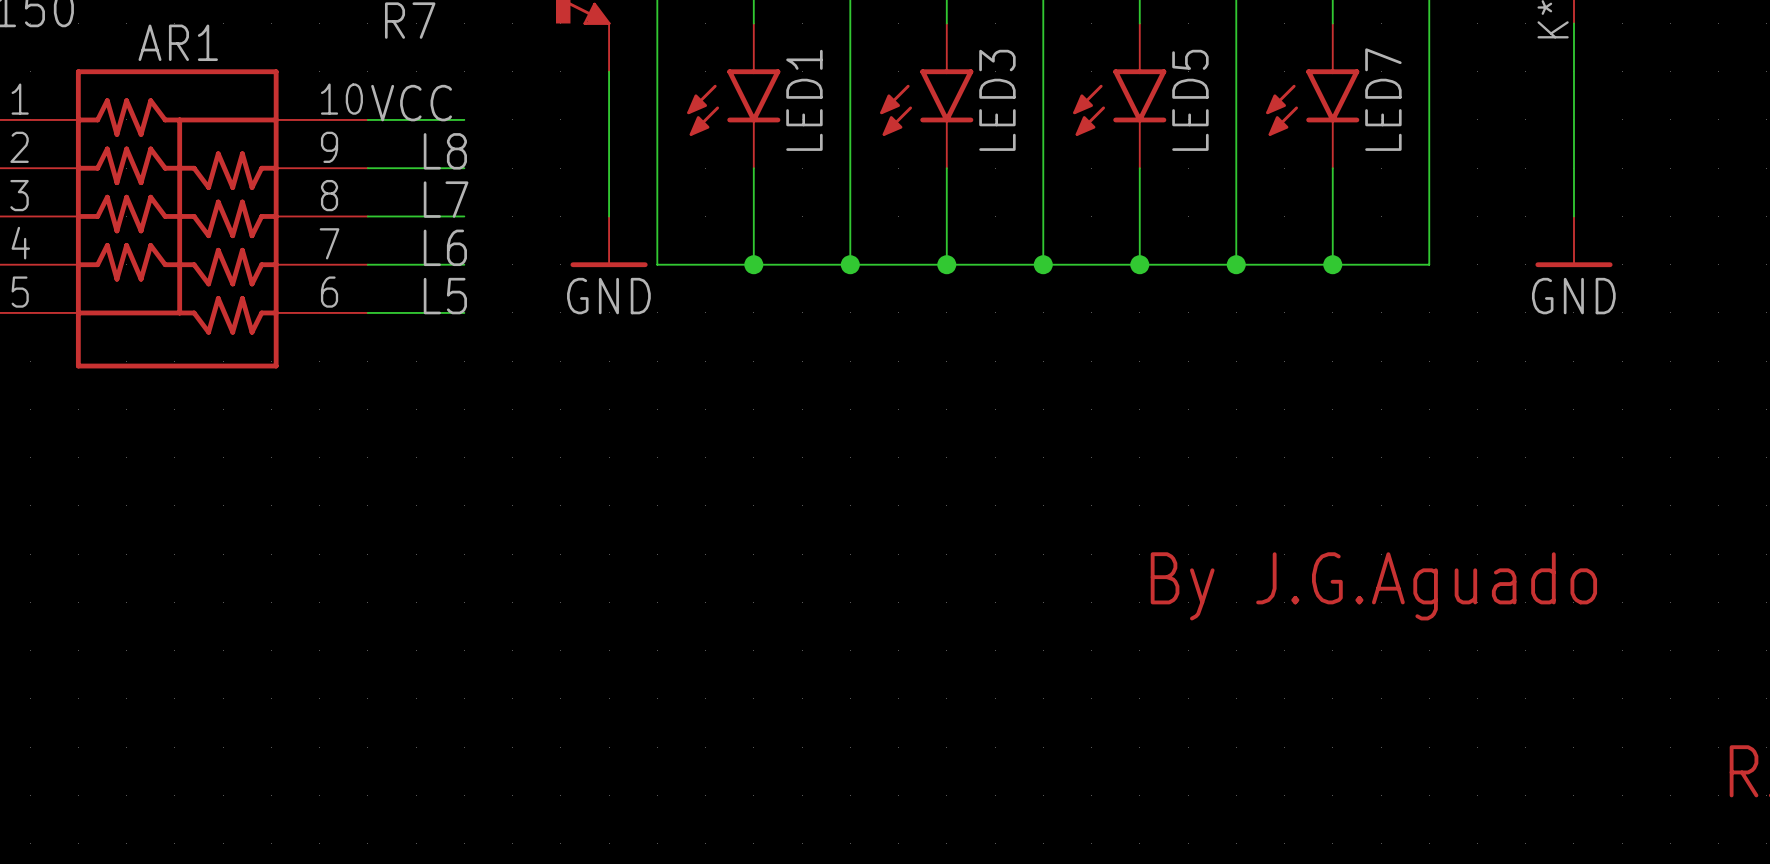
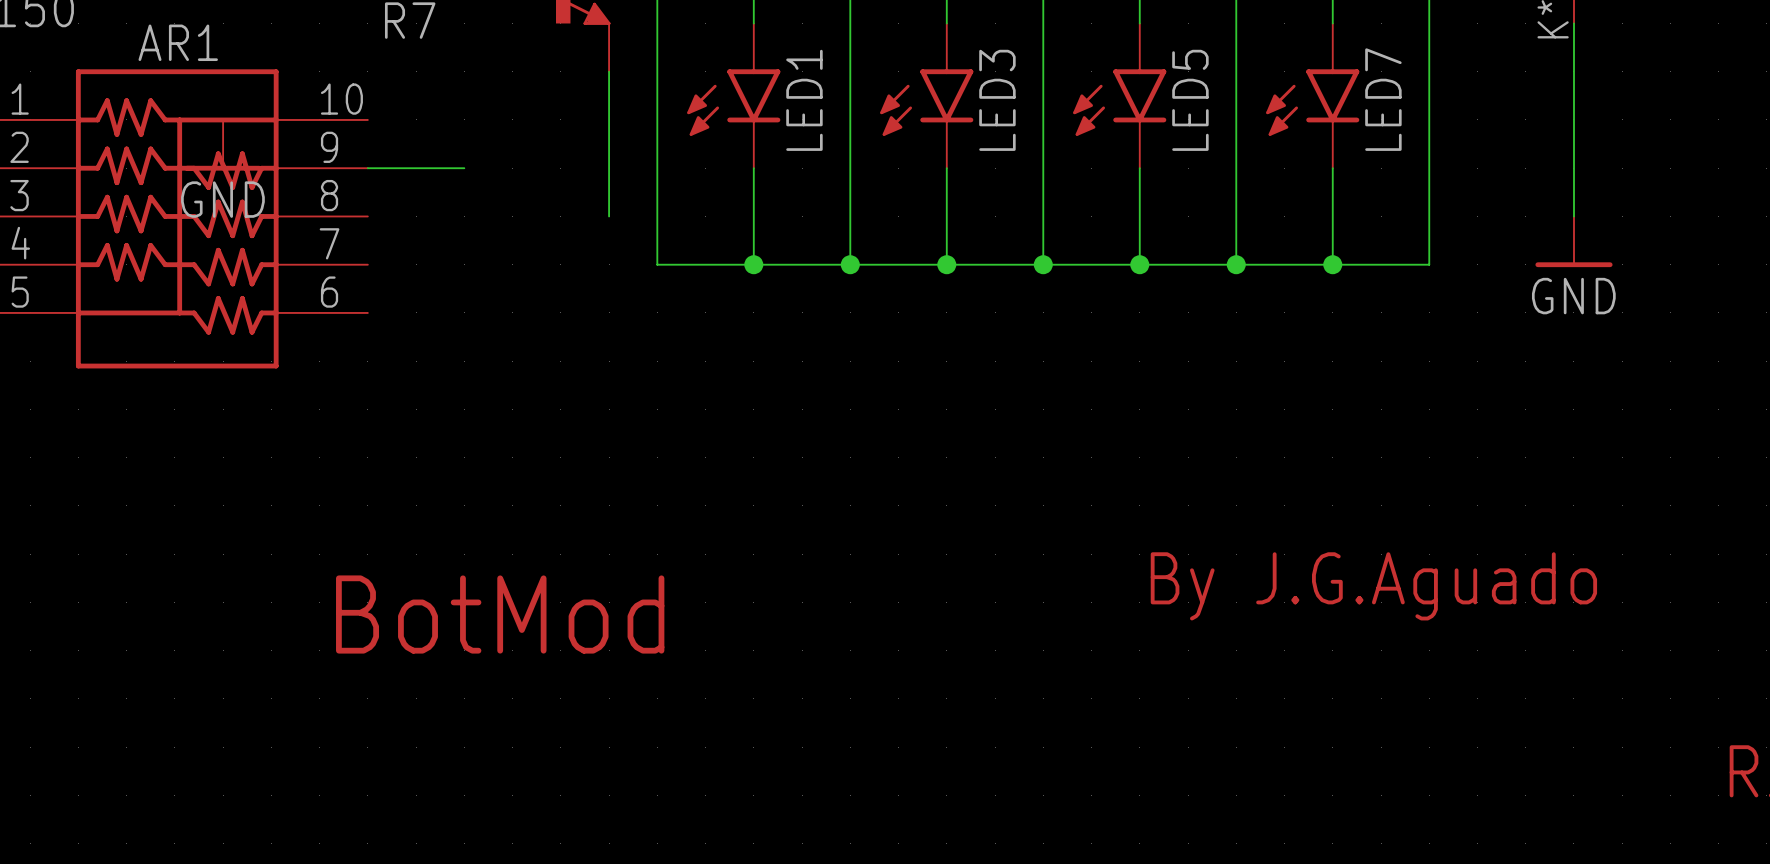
label: VCC (411, 103) -> none
wire: (367, 119) (464, 119) -> none
label: L8 (445, 151) -> none
label: L7 (446, 199) -> none
wire: (367, 216) (464, 216) -> none
power symbol position: GND (609, 241) -> GND (223, 145)
label: L6 (445, 247) -> none
wire: (367, 264) (464, 264) -> none
label: L5 (445, 296) -> none
wire: (367, 312) (464, 312) -> none
text: none -> BotMod (500, 614)

